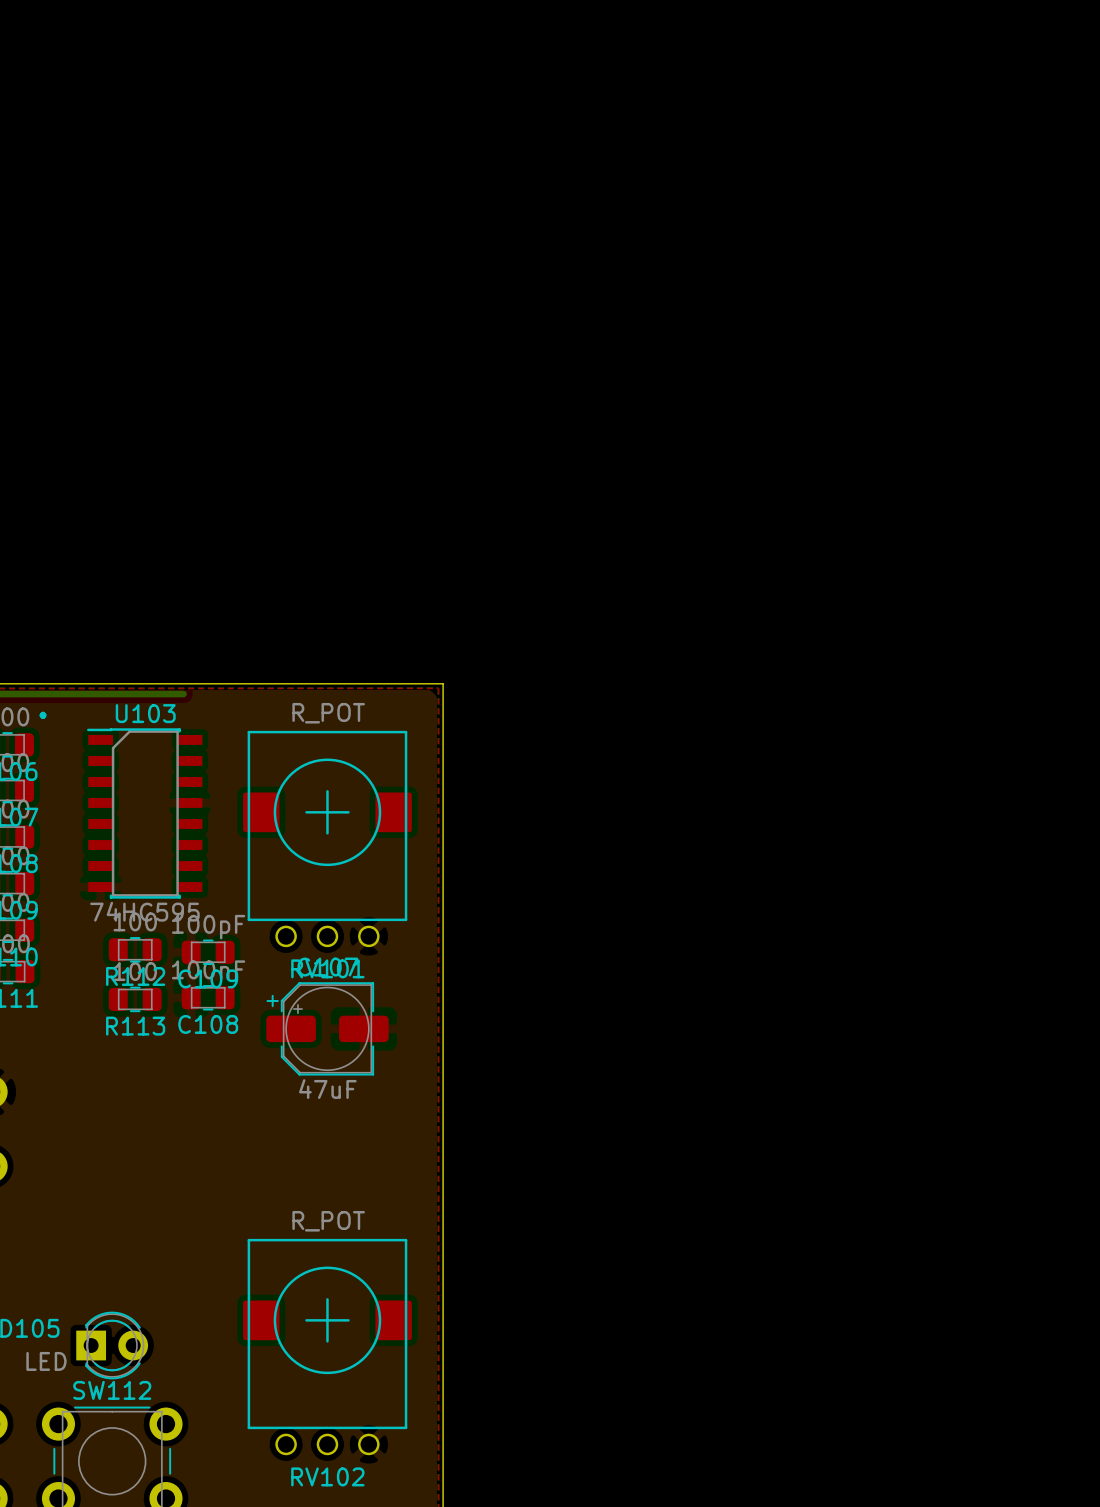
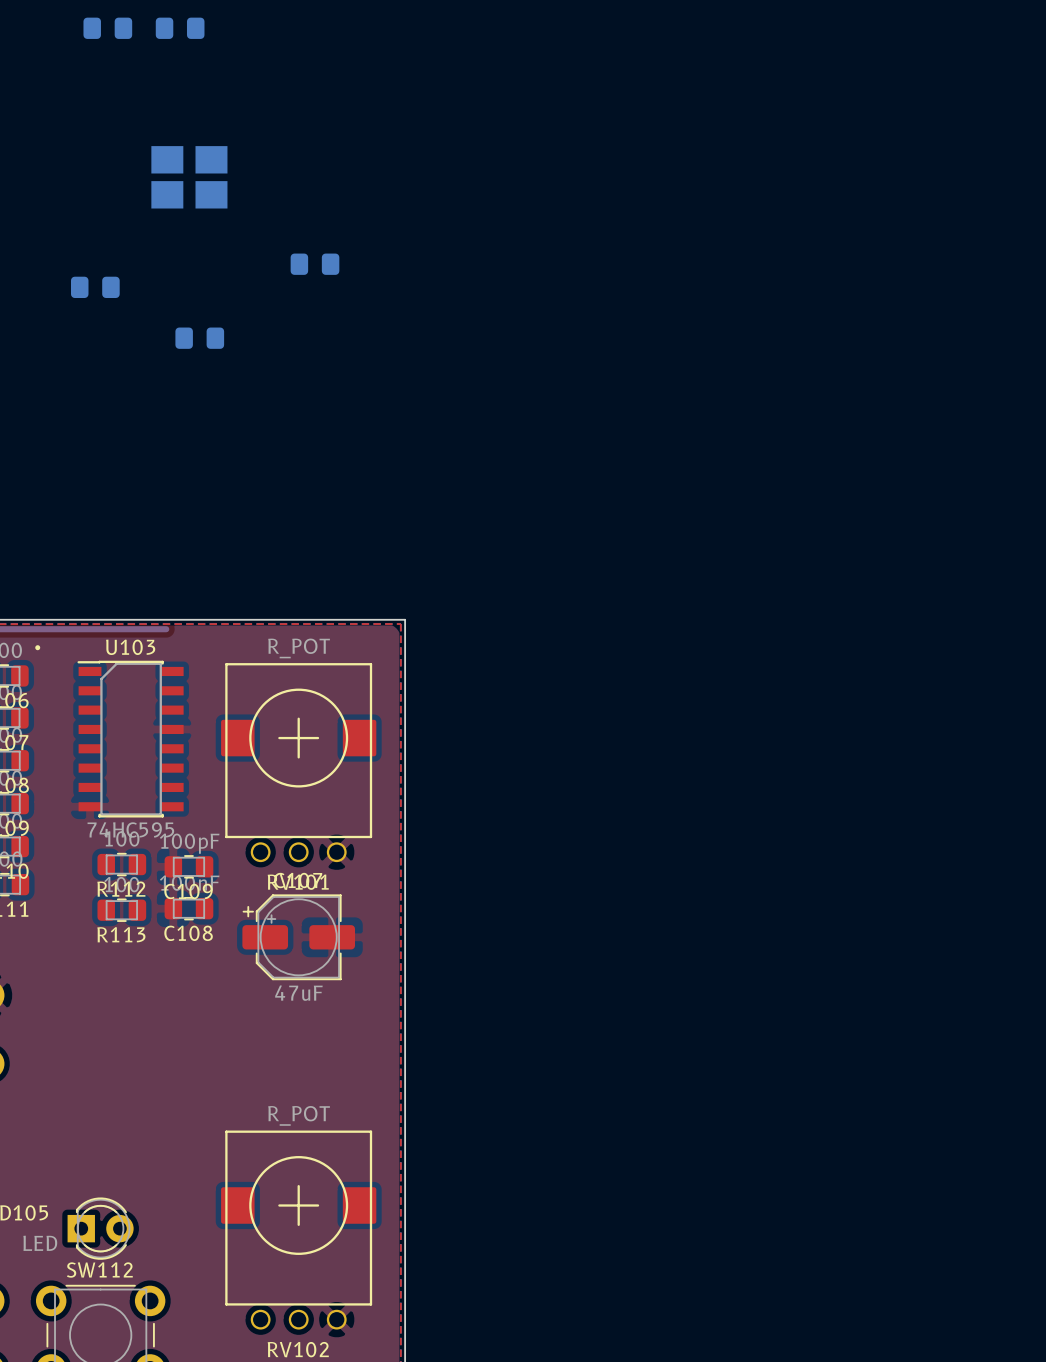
part: none -> (107, 28)
part: none -> (180, 28)
part: none -> (189, 177)
part: none -> (314, 264)
part: none -> (95, 287)
part: none -> (199, 338)

